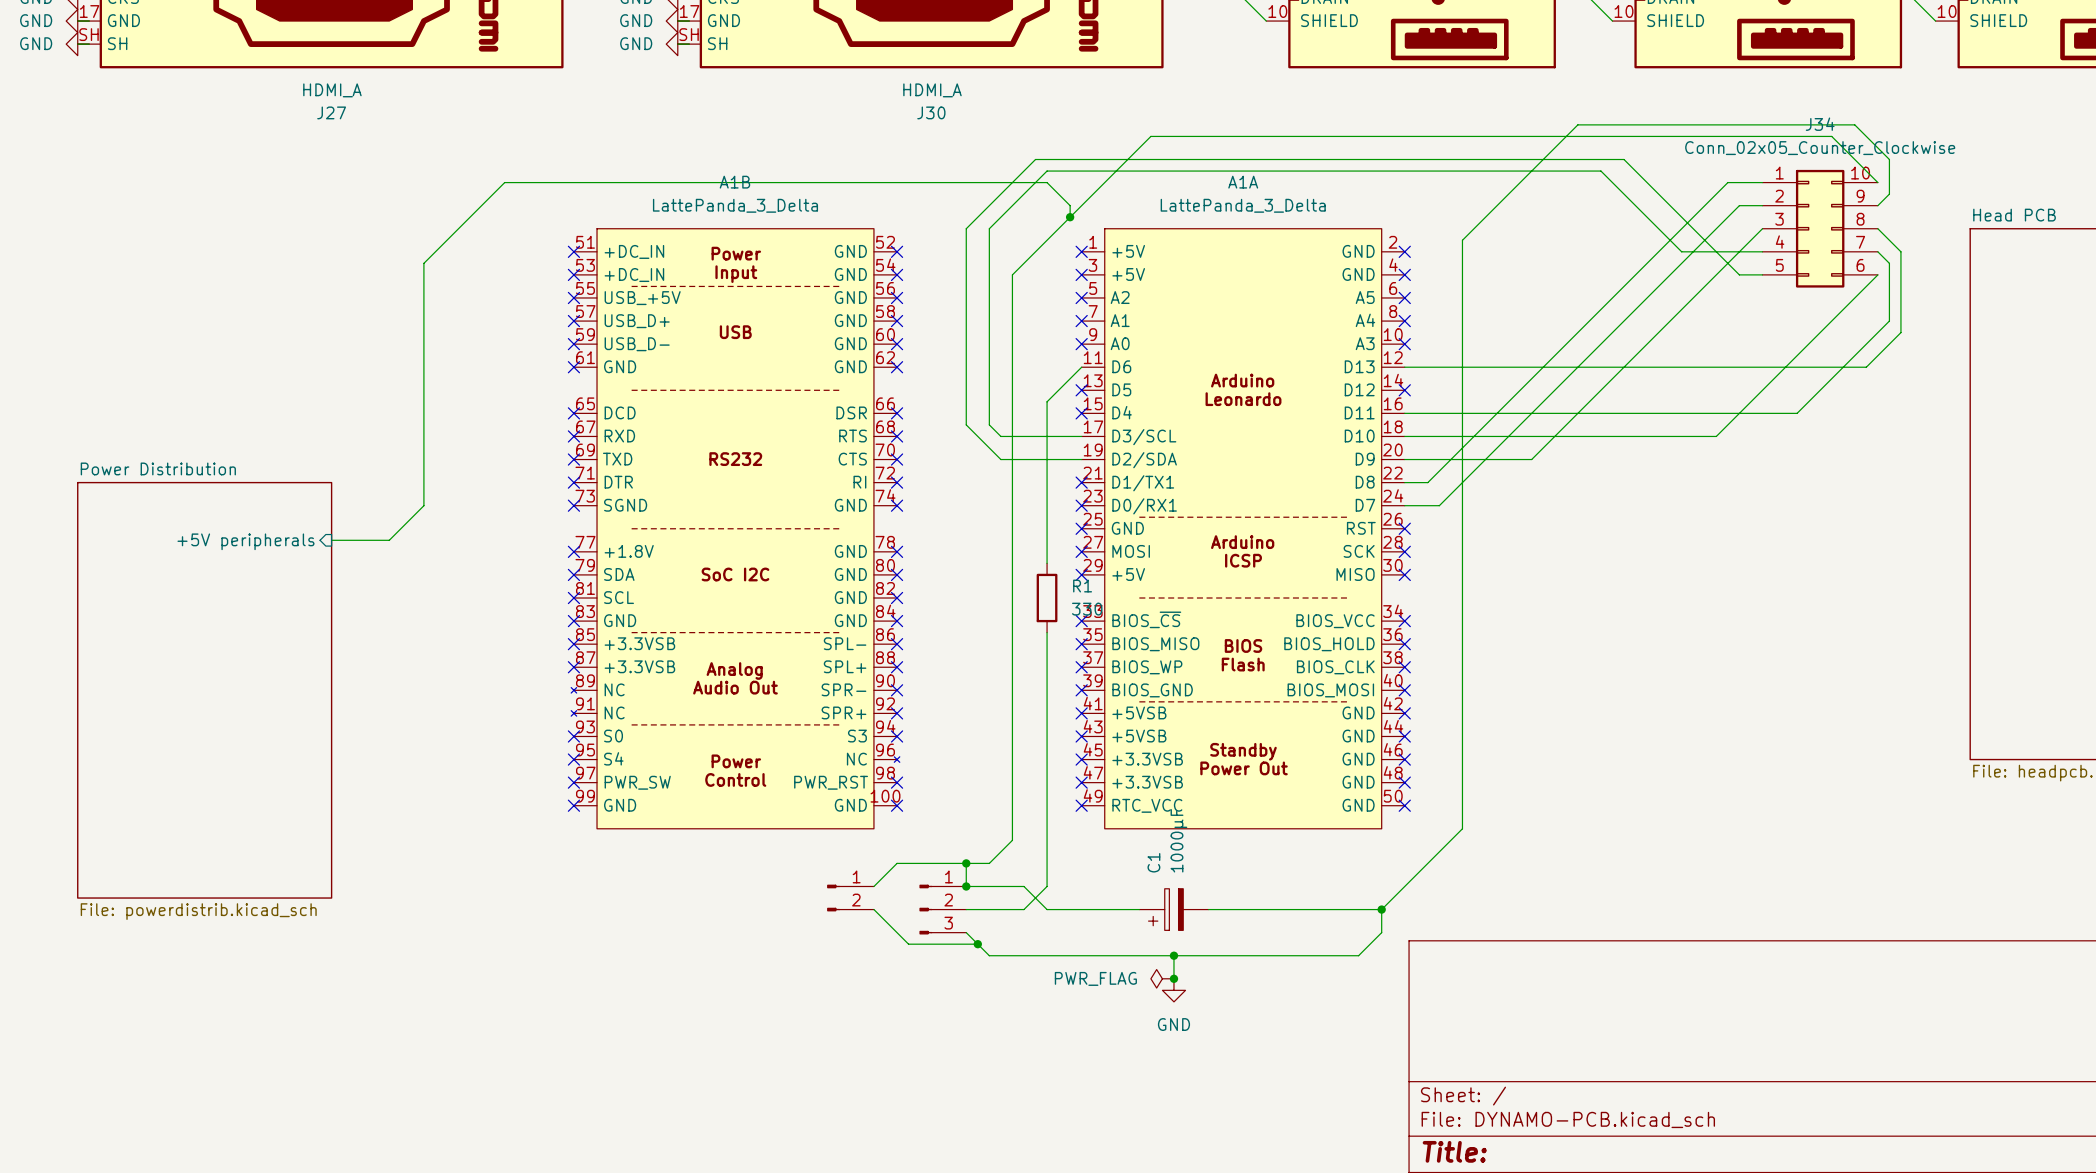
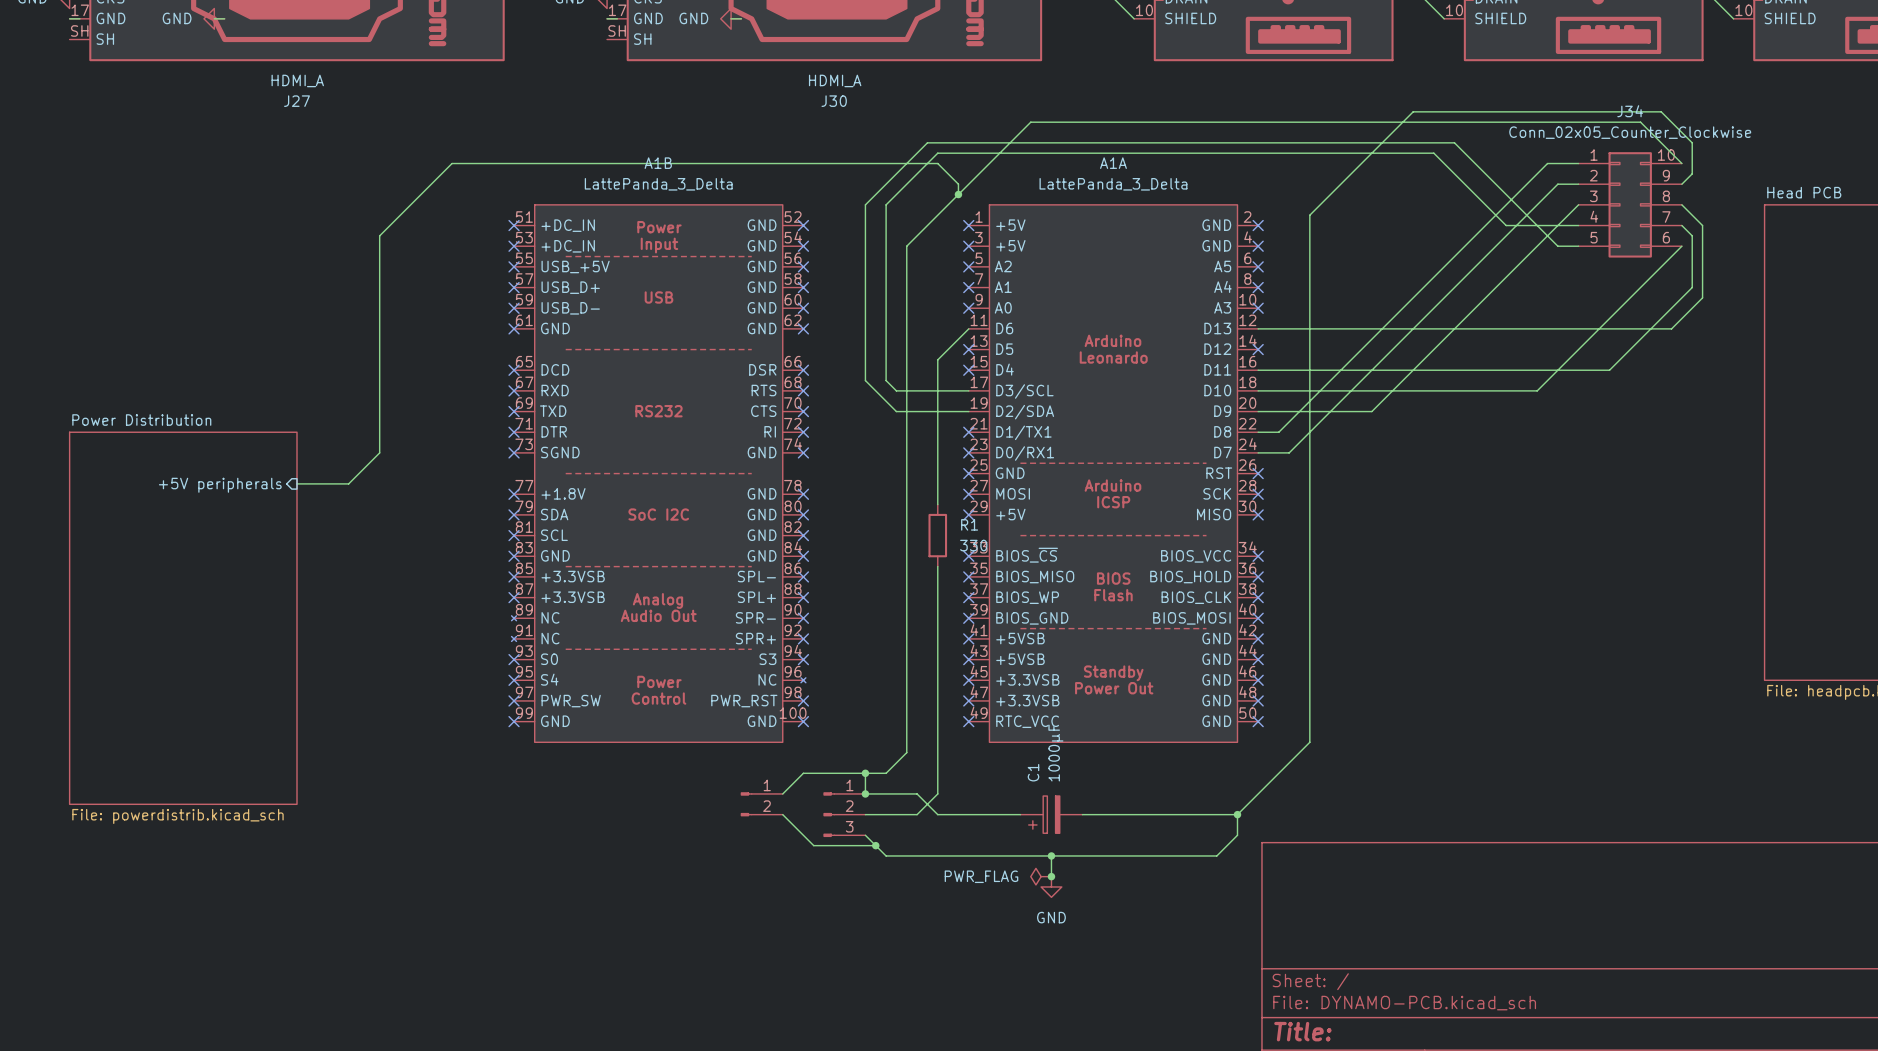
power symbol: GND (77, 21) -> none
power symbol: none -> GND (214, 18)
power symbol: GND (677, 21) -> none
power symbol: none -> GND (731, 18)
power symbol: GND (77, 44) -> none
power symbol: GND (677, 44) -> none

